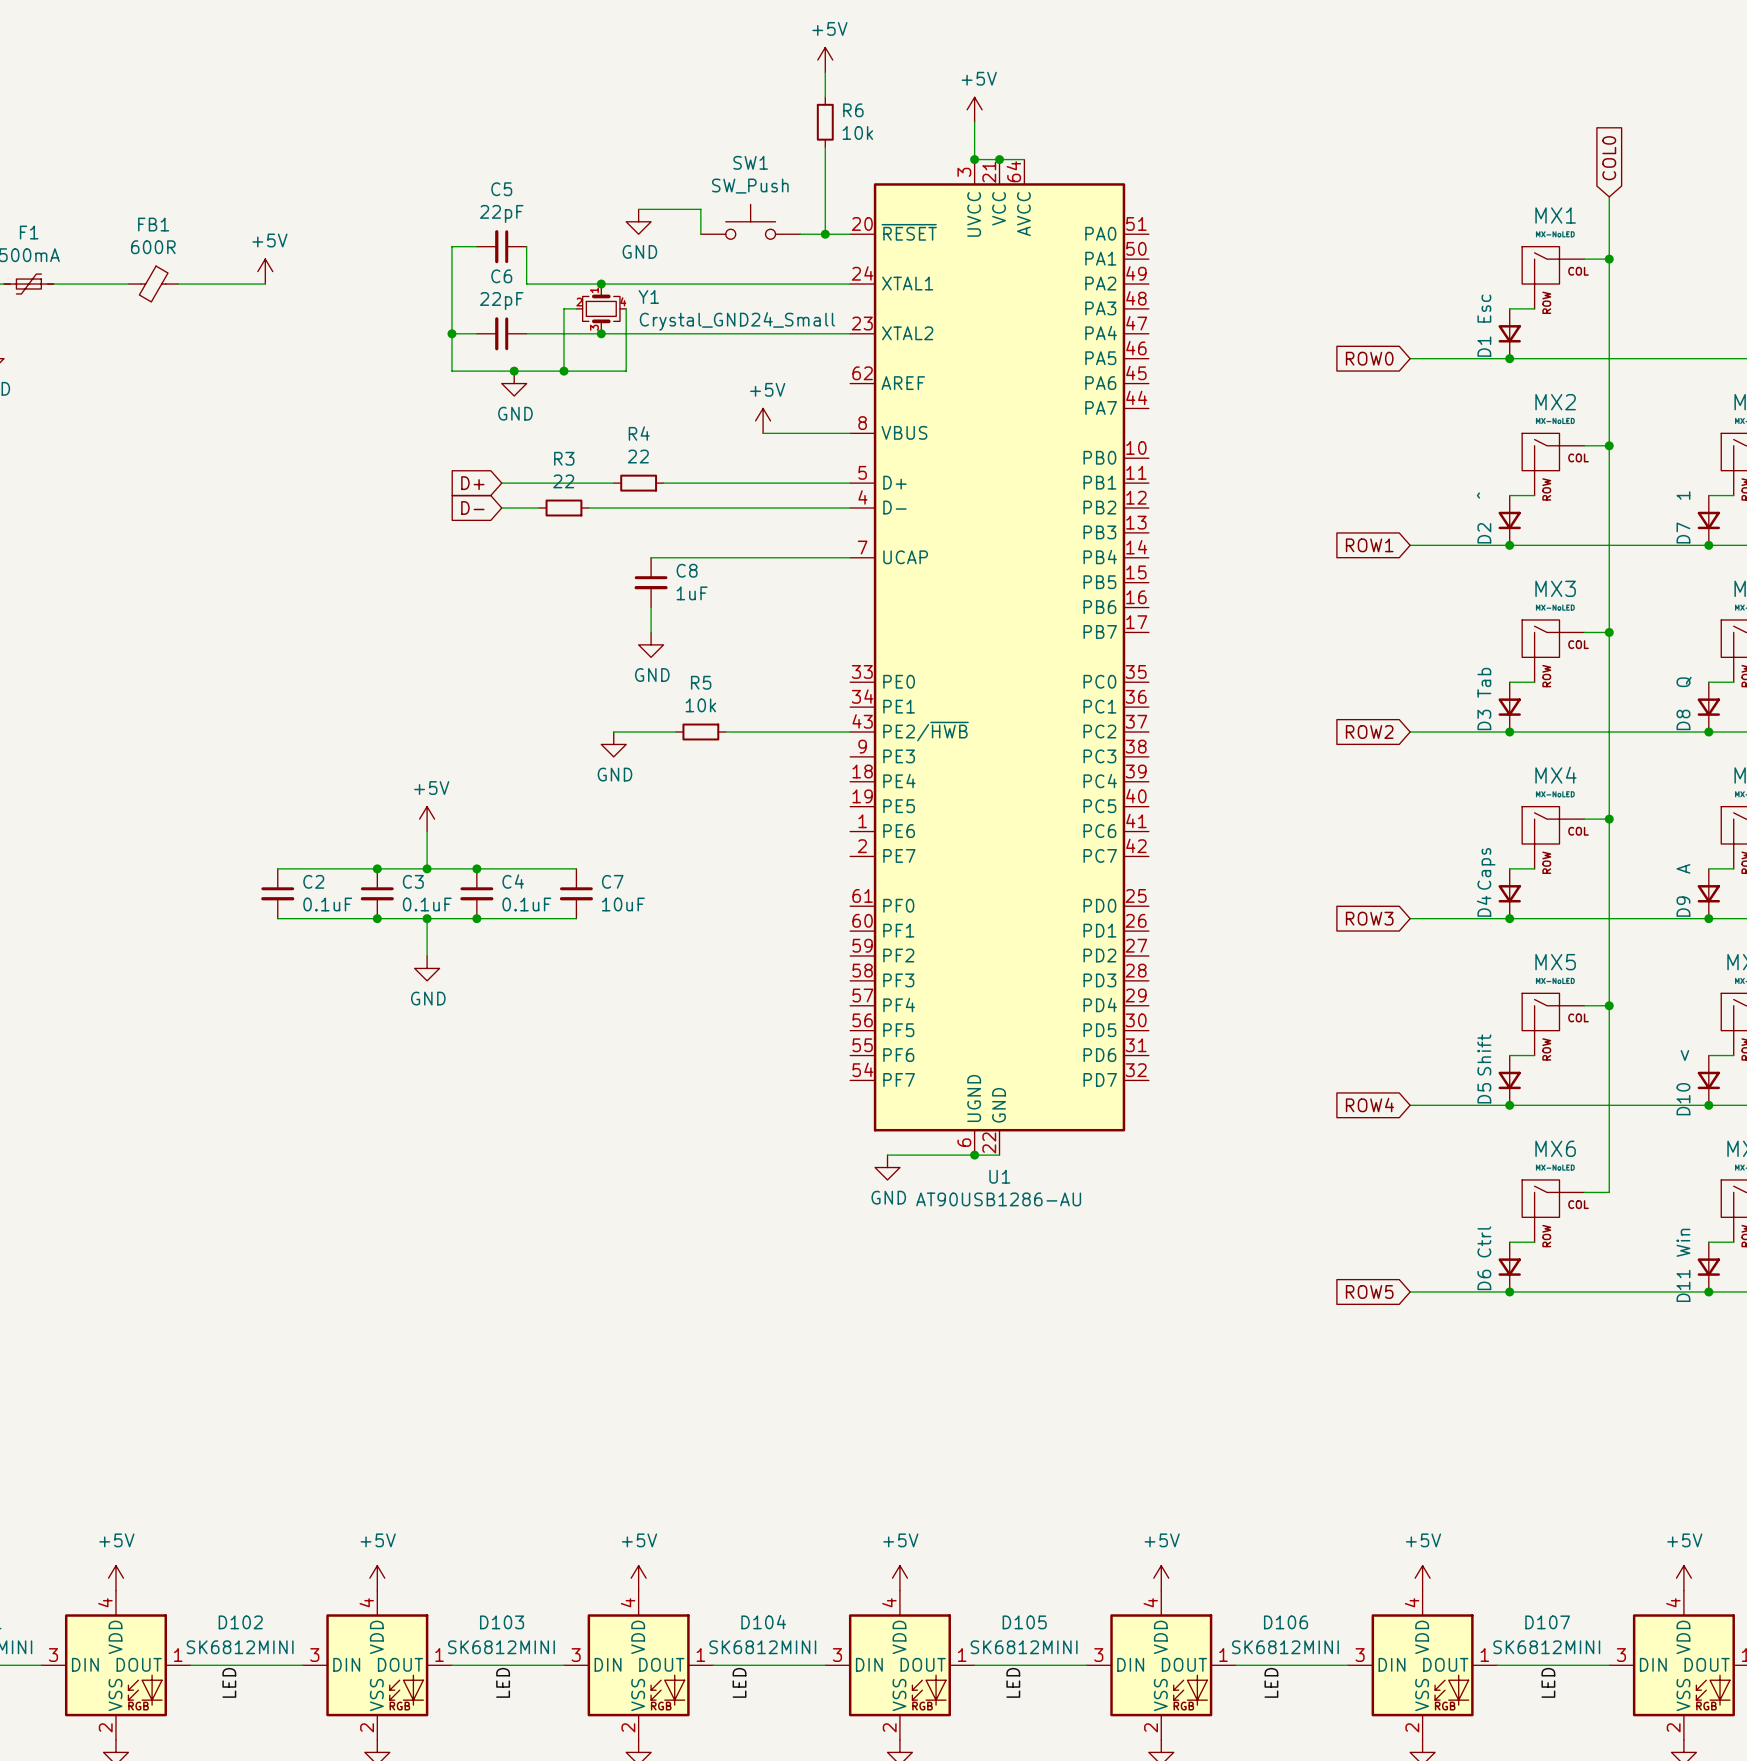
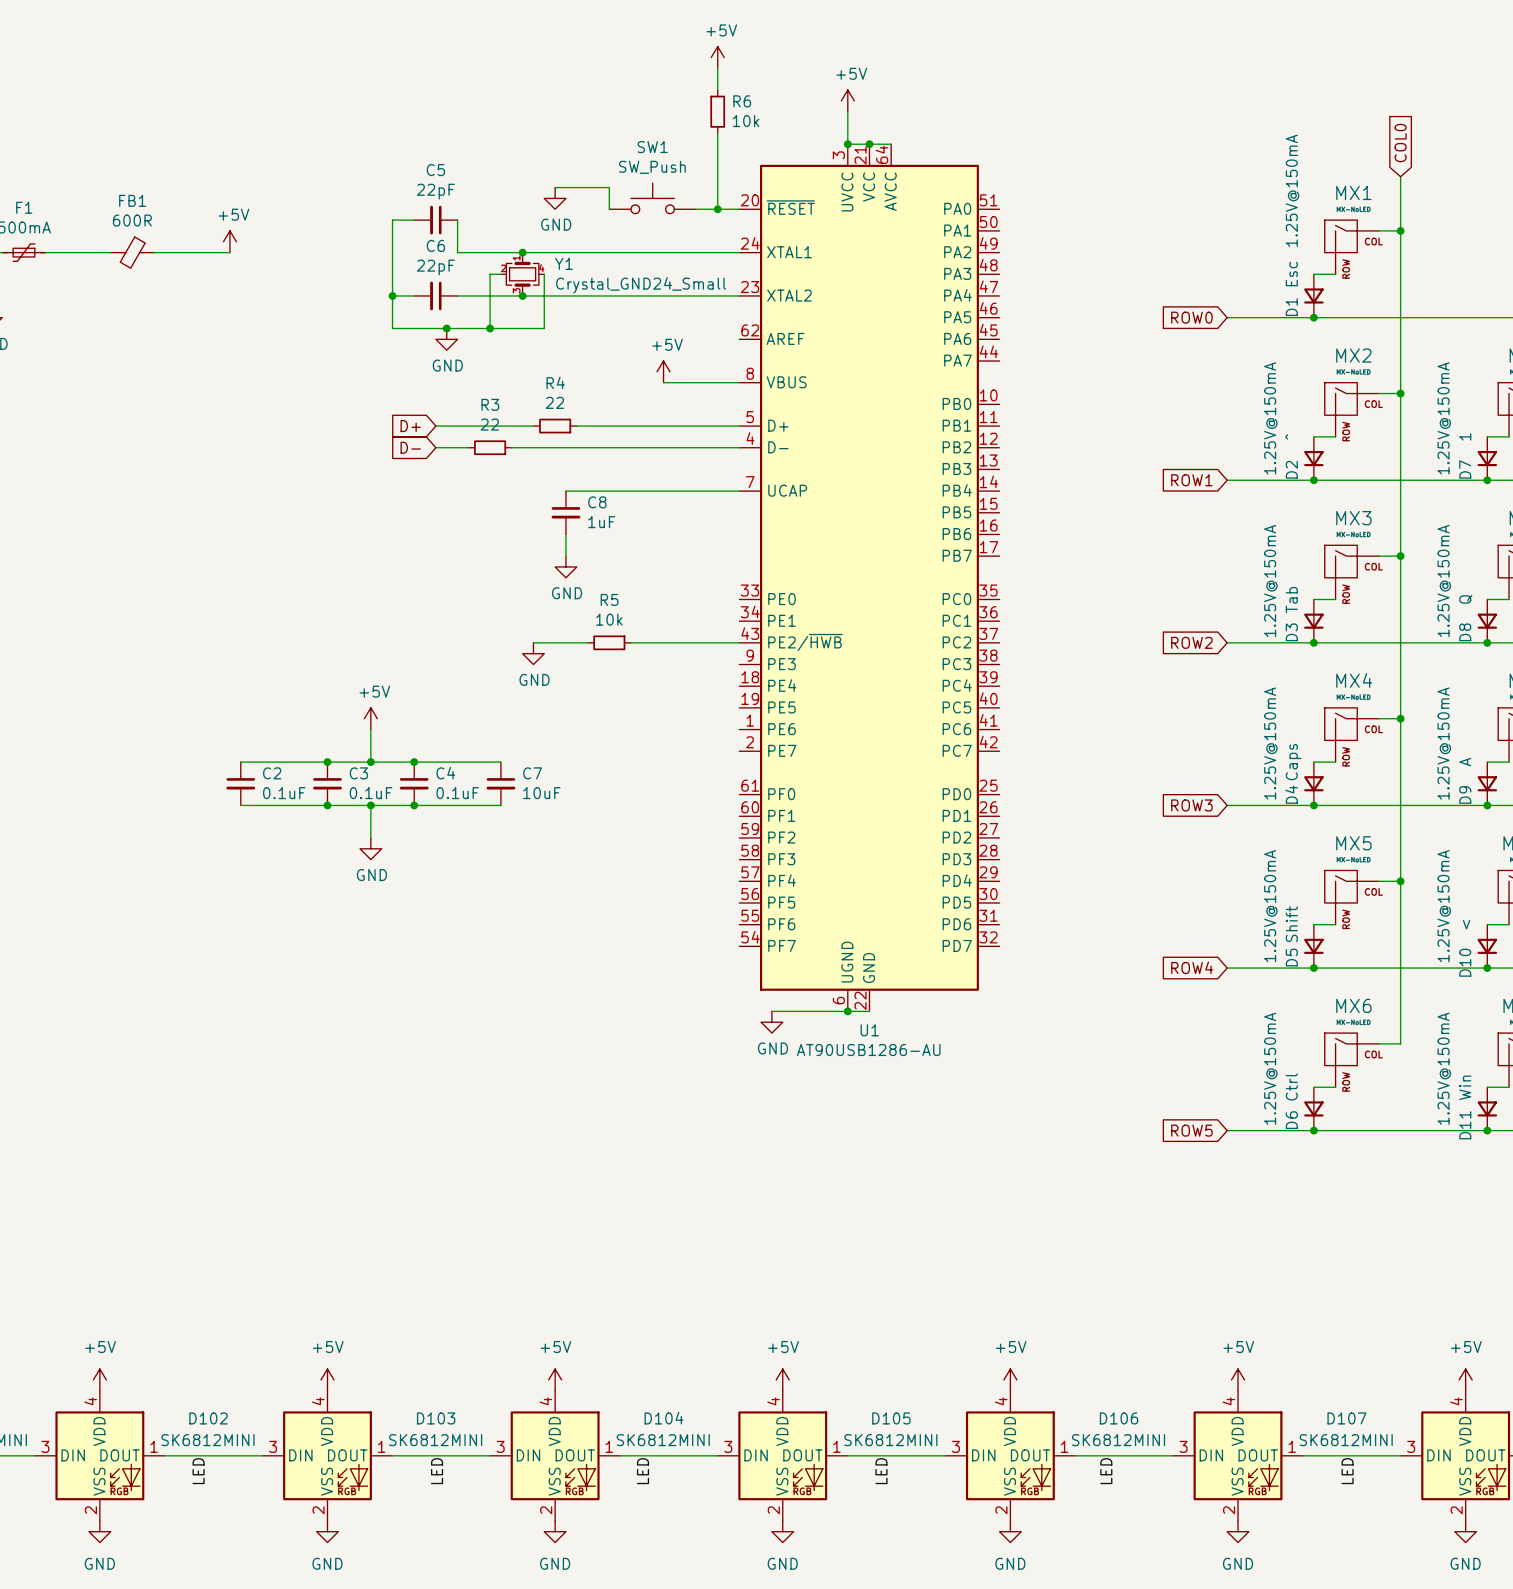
D1 value: none -> 1.25V@150mA (1292, 190)
D2 value: none -> 1.25V@150mA (1270, 418)
D7 value: none -> 1.25V@150mA (1444, 418)
D3 value: none -> 1.25V@150mA (1270, 580)
D8 value: none -> 1.25V@150mA (1444, 580)
D4 value: none -> 1.25V@150mA (1270, 743)
D9 value: none -> 1.25V@150mA (1444, 743)
D5 value: none -> 1.25V@150mA (1270, 906)
D10 value: none -> 1.25V@150mA (1444, 906)
D6 value: none -> 1.25V@150mA (1270, 1068)
D11 value: none -> 1.25V@150mA (1444, 1068)

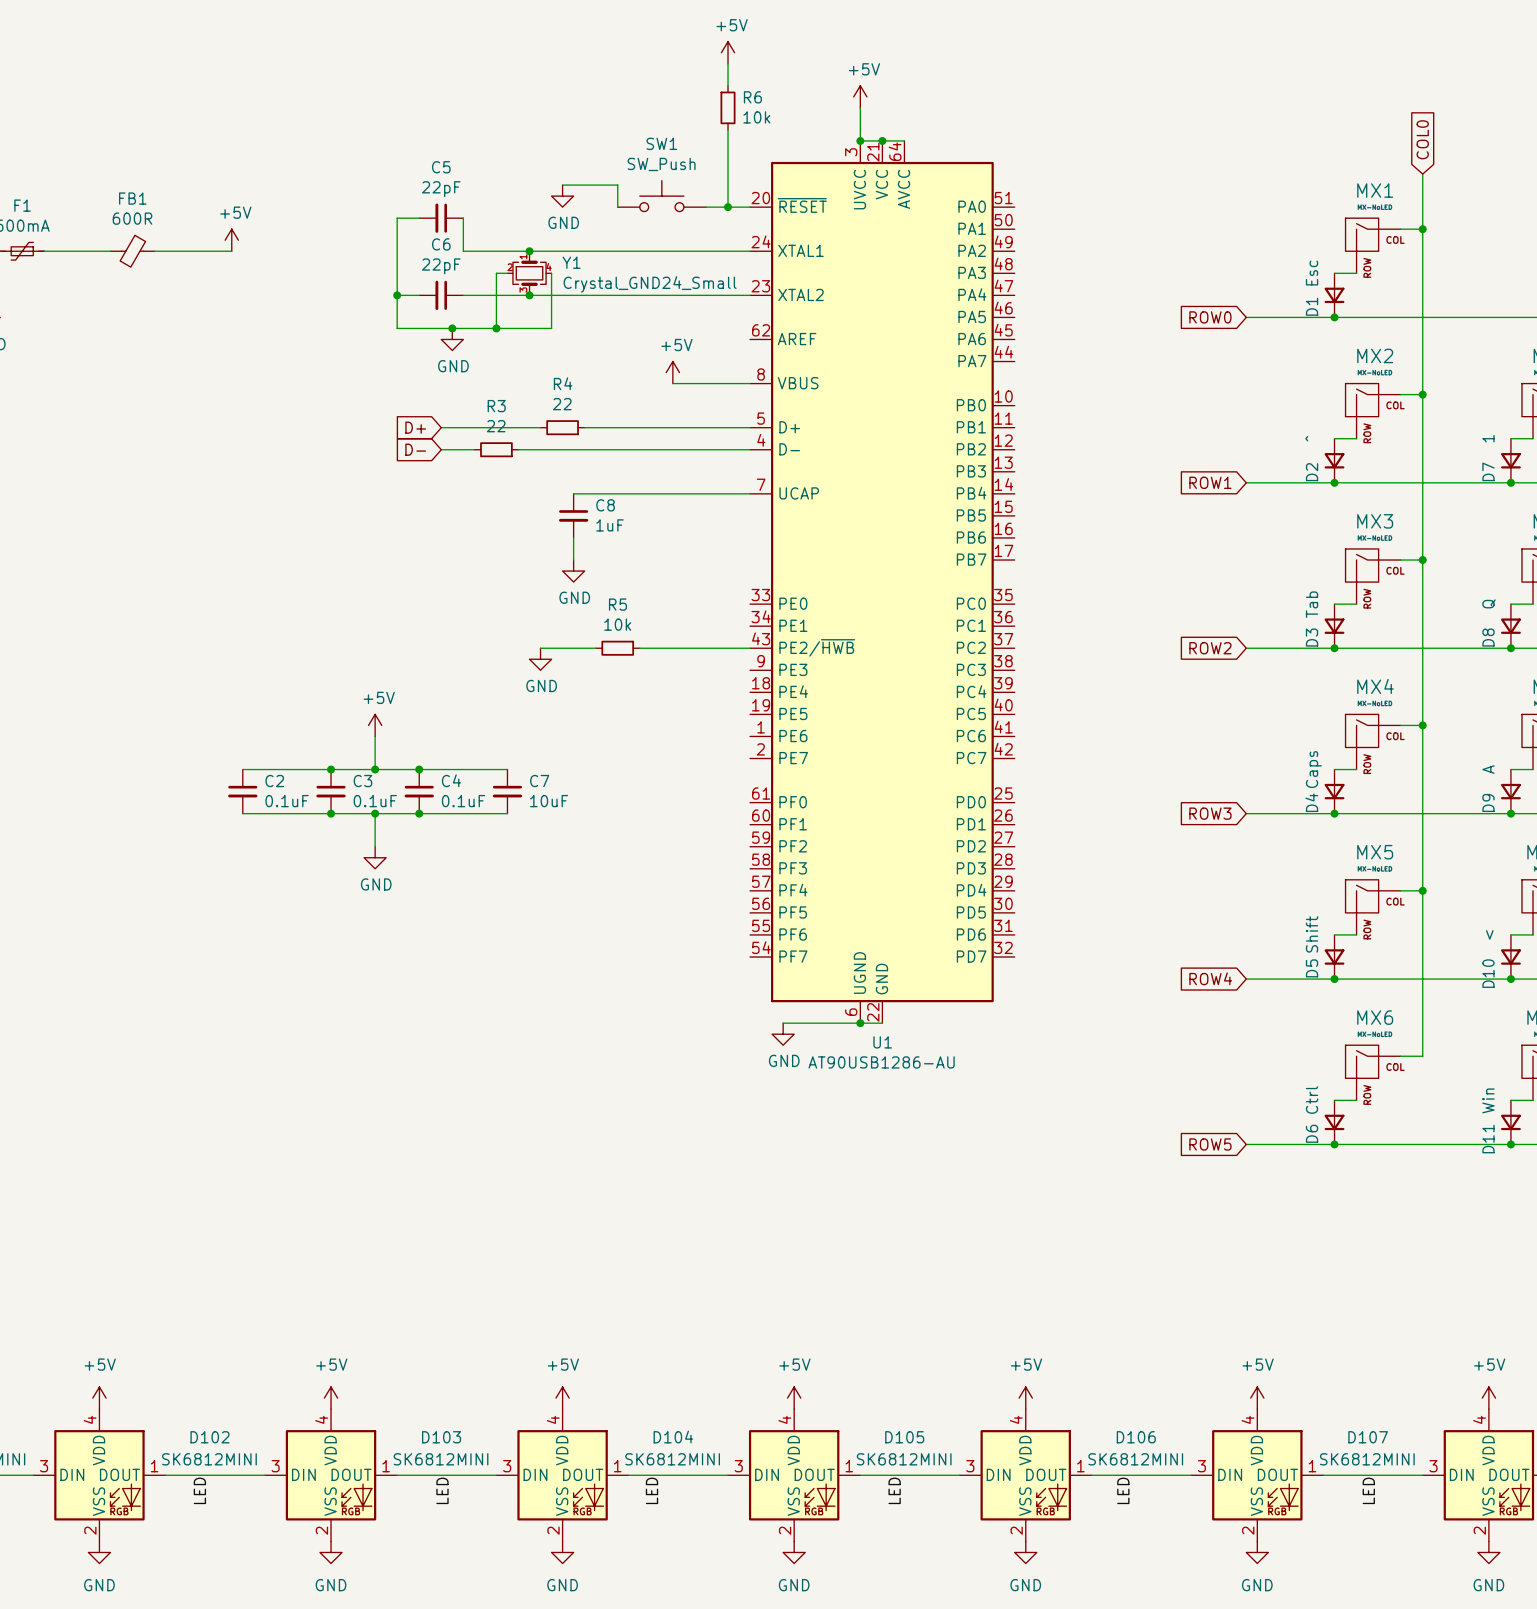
D1 value: 1.25V@150mA (1292, 190) -> none
D2 value: 1.25V@150mA (1270, 418) -> none
D7 value: 1.25V@150mA (1444, 418) -> none
D3 value: 1.25V@150mA (1270, 580) -> none
D8 value: 1.25V@150mA (1444, 580) -> none
D4 value: 1.25V@150mA (1270, 743) -> none
D9 value: 1.25V@150mA (1444, 743) -> none
D5 value: 1.25V@150mA (1270, 906) -> none
D10 value: 1.25V@150mA (1444, 906) -> none
D6 value: 1.25V@150mA (1270, 1068) -> none
D11 value: 1.25V@150mA (1444, 1068) -> none

